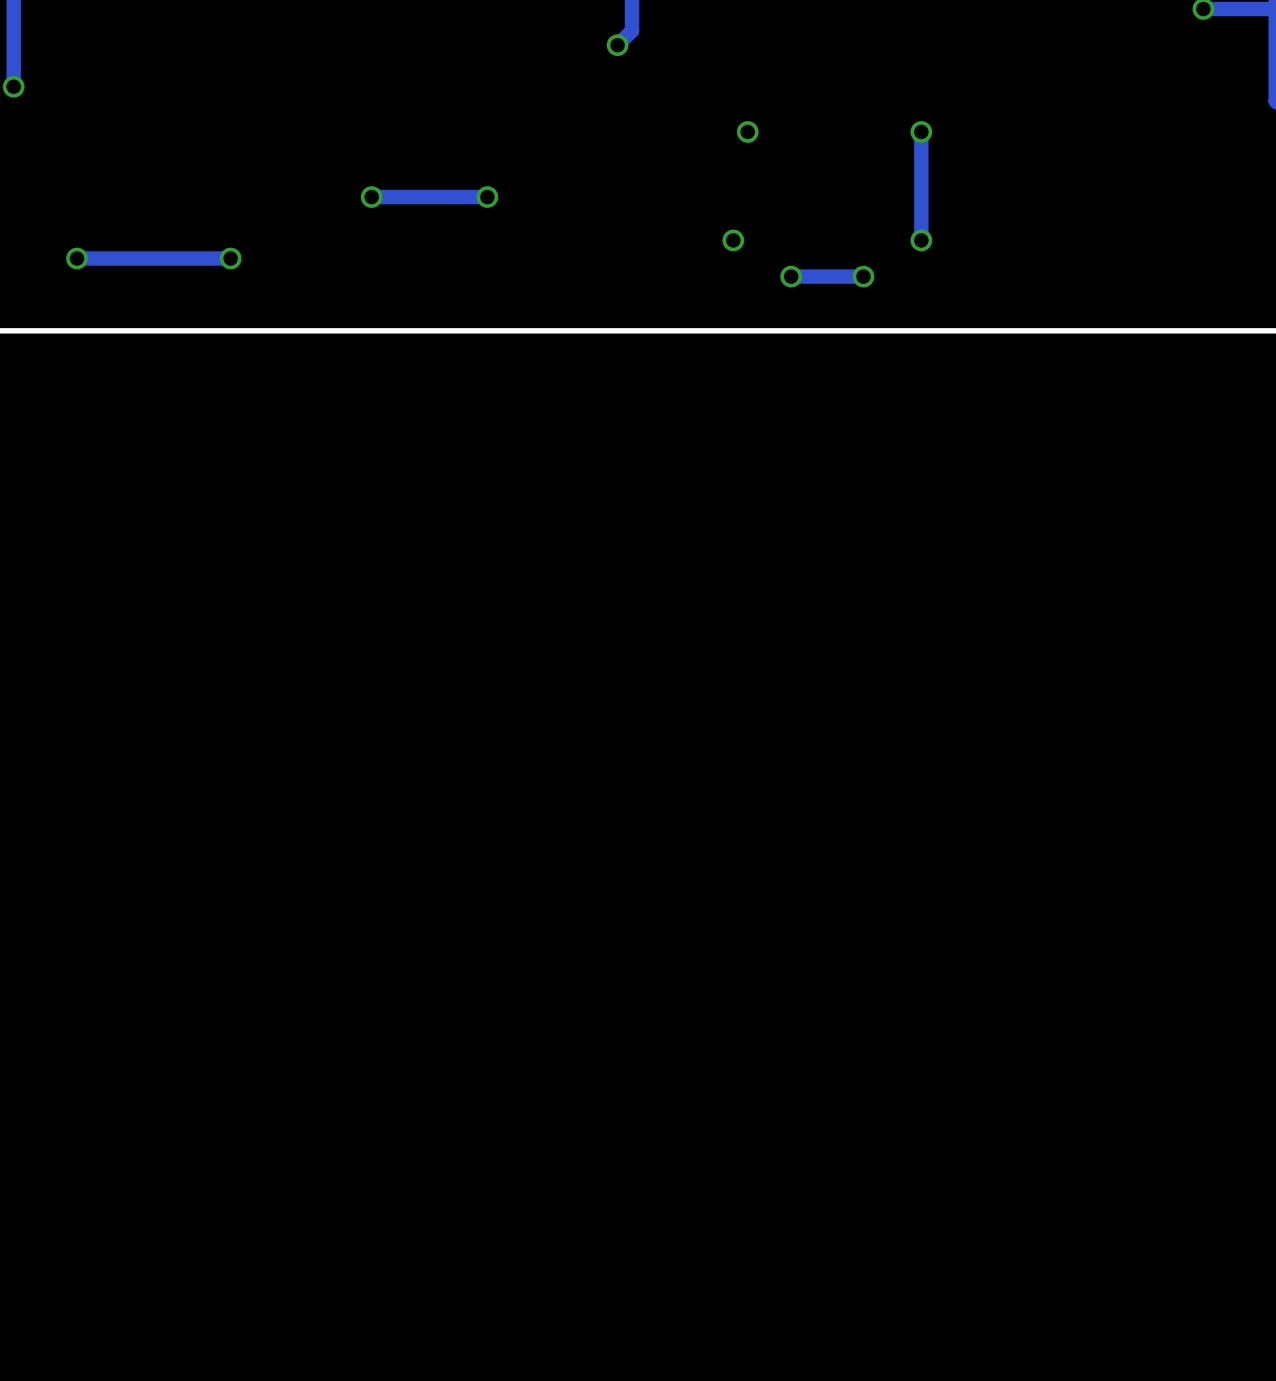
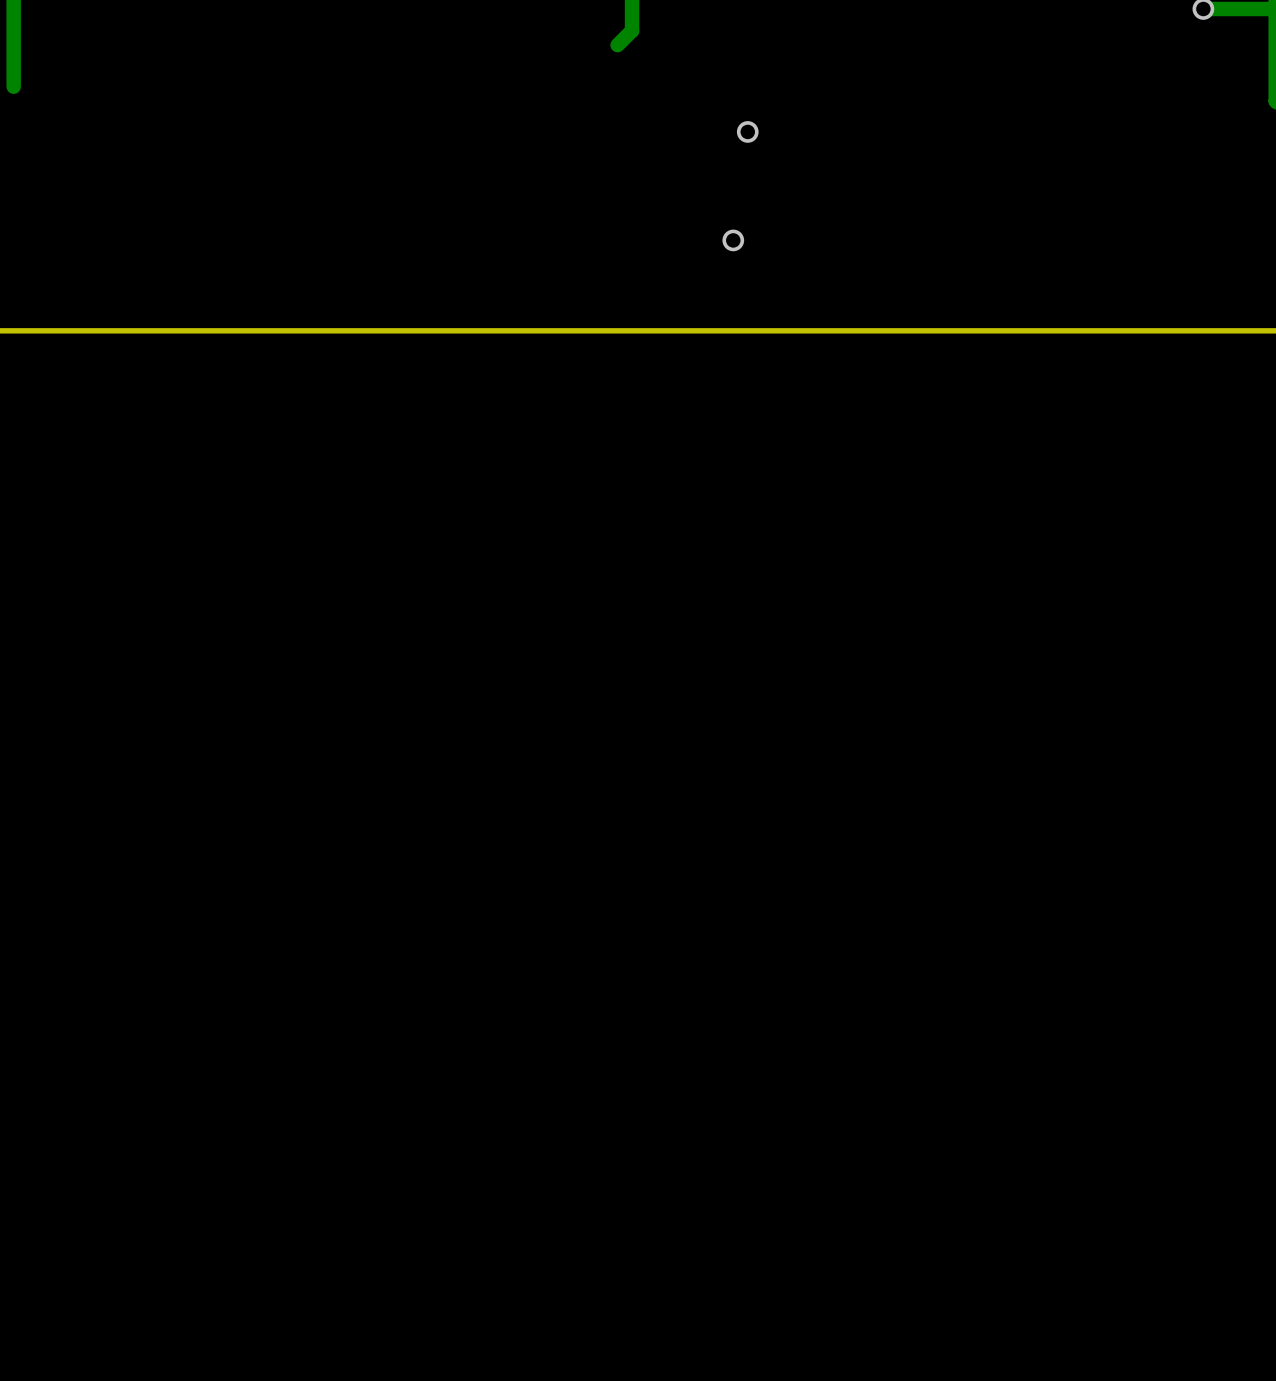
via: (617, 45) -> none
via: (13, 86) -> none
track: (921, 131) (921, 240) -> none
via: (921, 131) -> none
via: (371, 197) -> none
track: (487, 197) (371, 197) -> none
via: (487, 197) -> none
via: (921, 240) -> none
via: (76, 258) -> none
track: (230, 258) (76, 258) -> none
via: (230, 258) -> none
via: (791, 276) -> none
track: (863, 276) (791, 276) -> none
via: (863, 276) -> none

